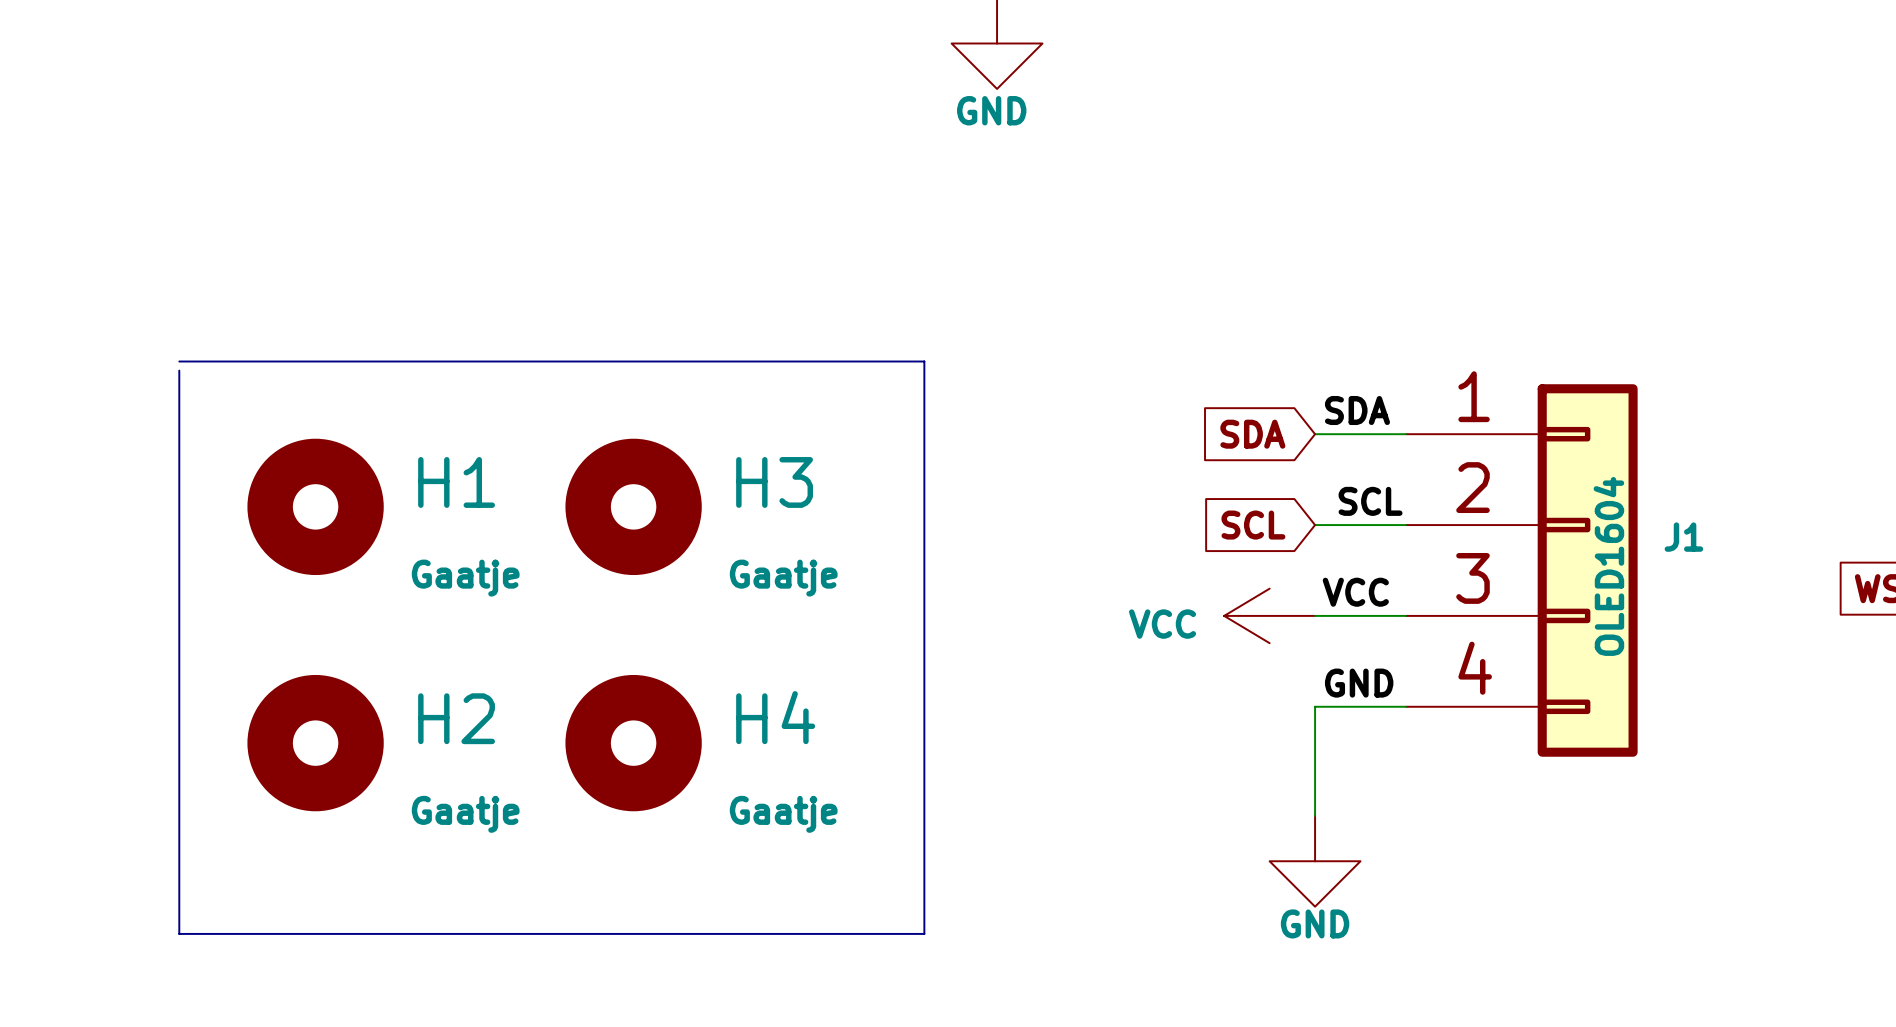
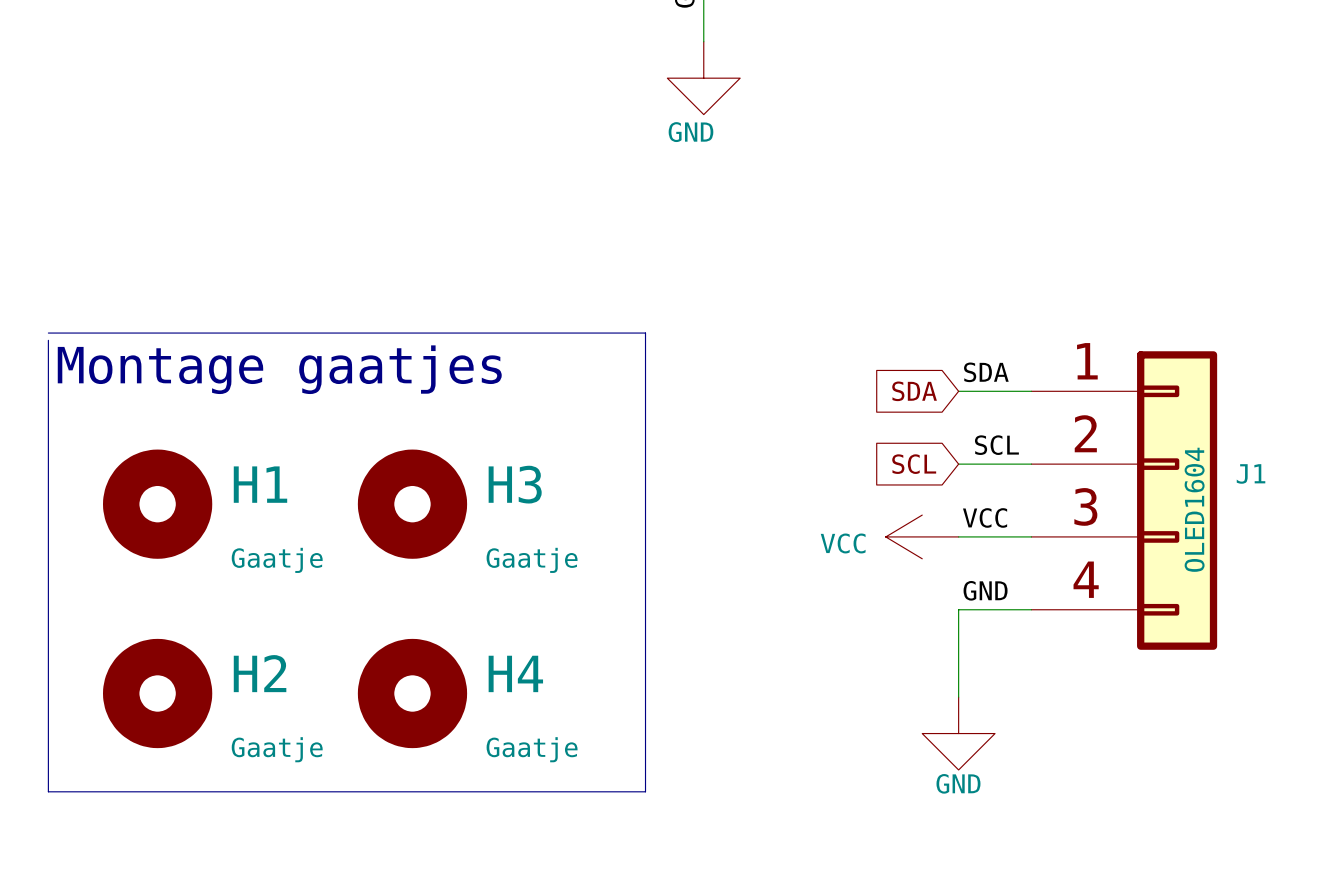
text: none -> Montage gaatjes (279, 369)
H1 position: (315, 506) -> (157, 504)
H3 position: (633, 506) -> (412, 504)
H2 position: (315, 743) -> (157, 693)
H4 position: (633, 743) -> (412, 693)

